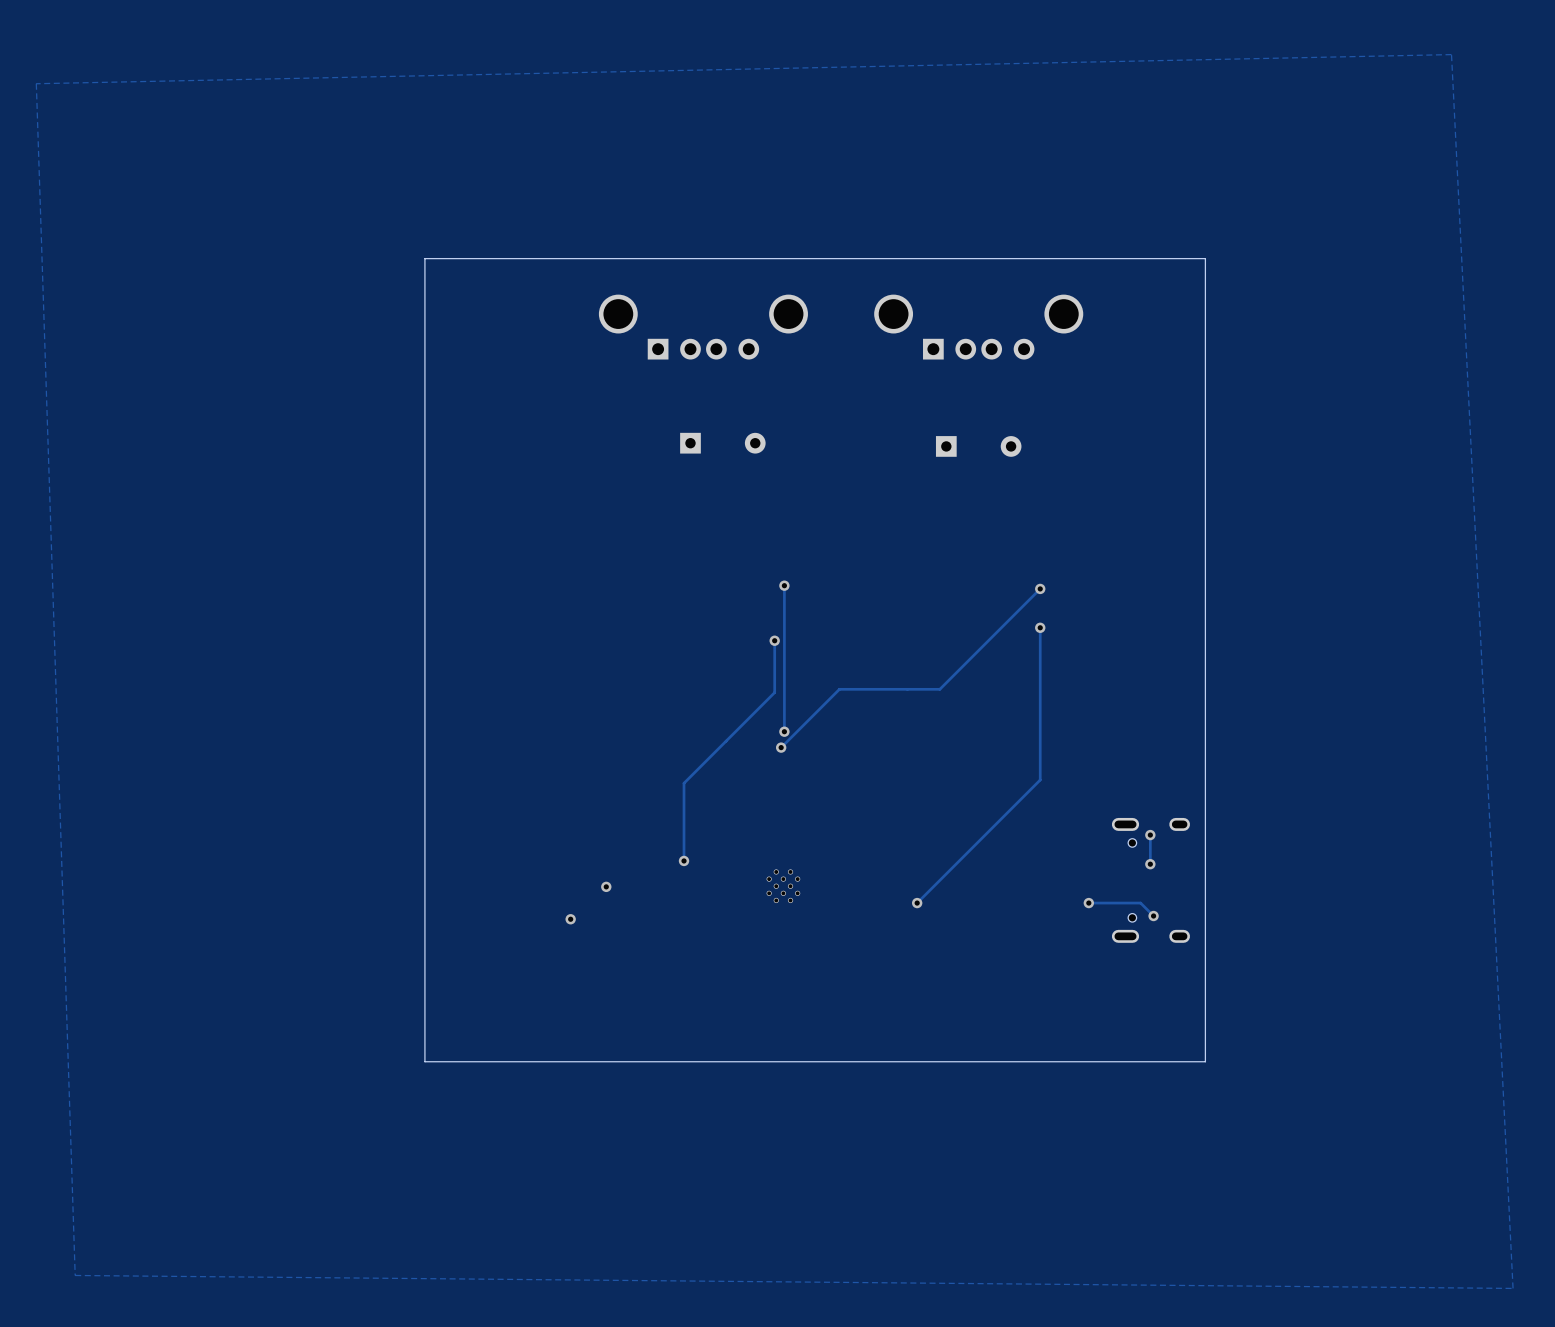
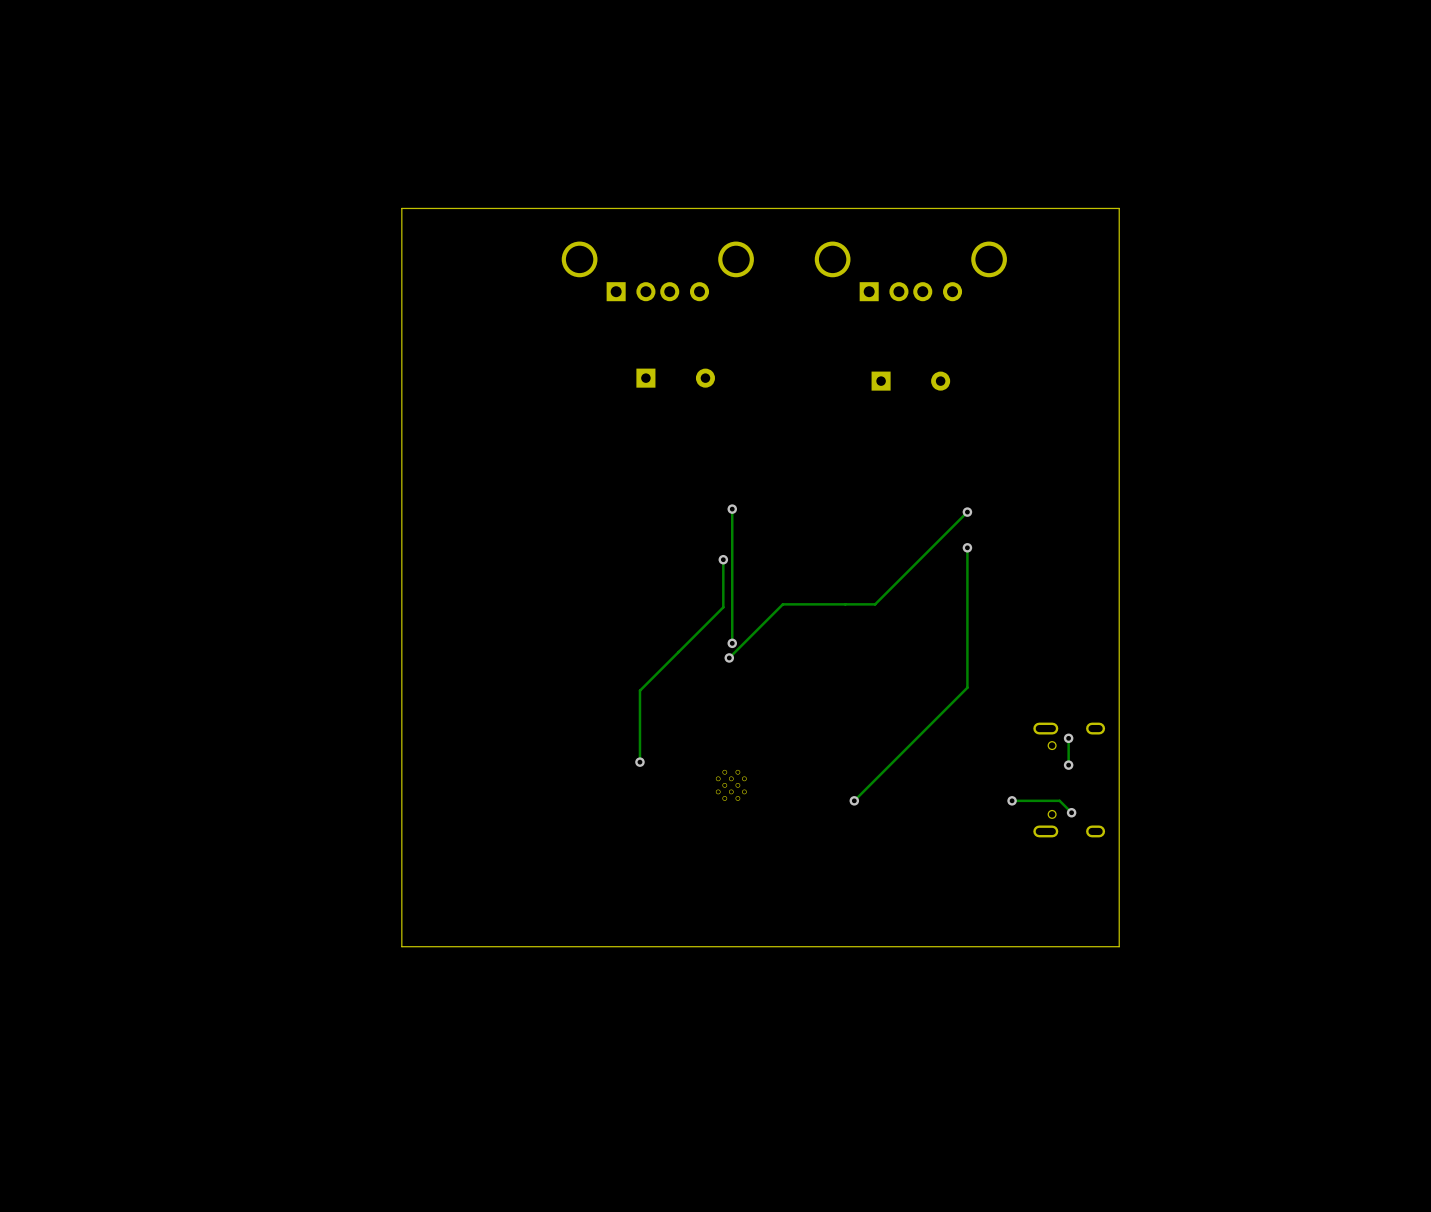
zone outline: (1451, 54) (1513, 1288) (75, 1275) (36, 83) (1451, 54) -> none
via: (606, 886) -> none
via: (570, 919) -> none

